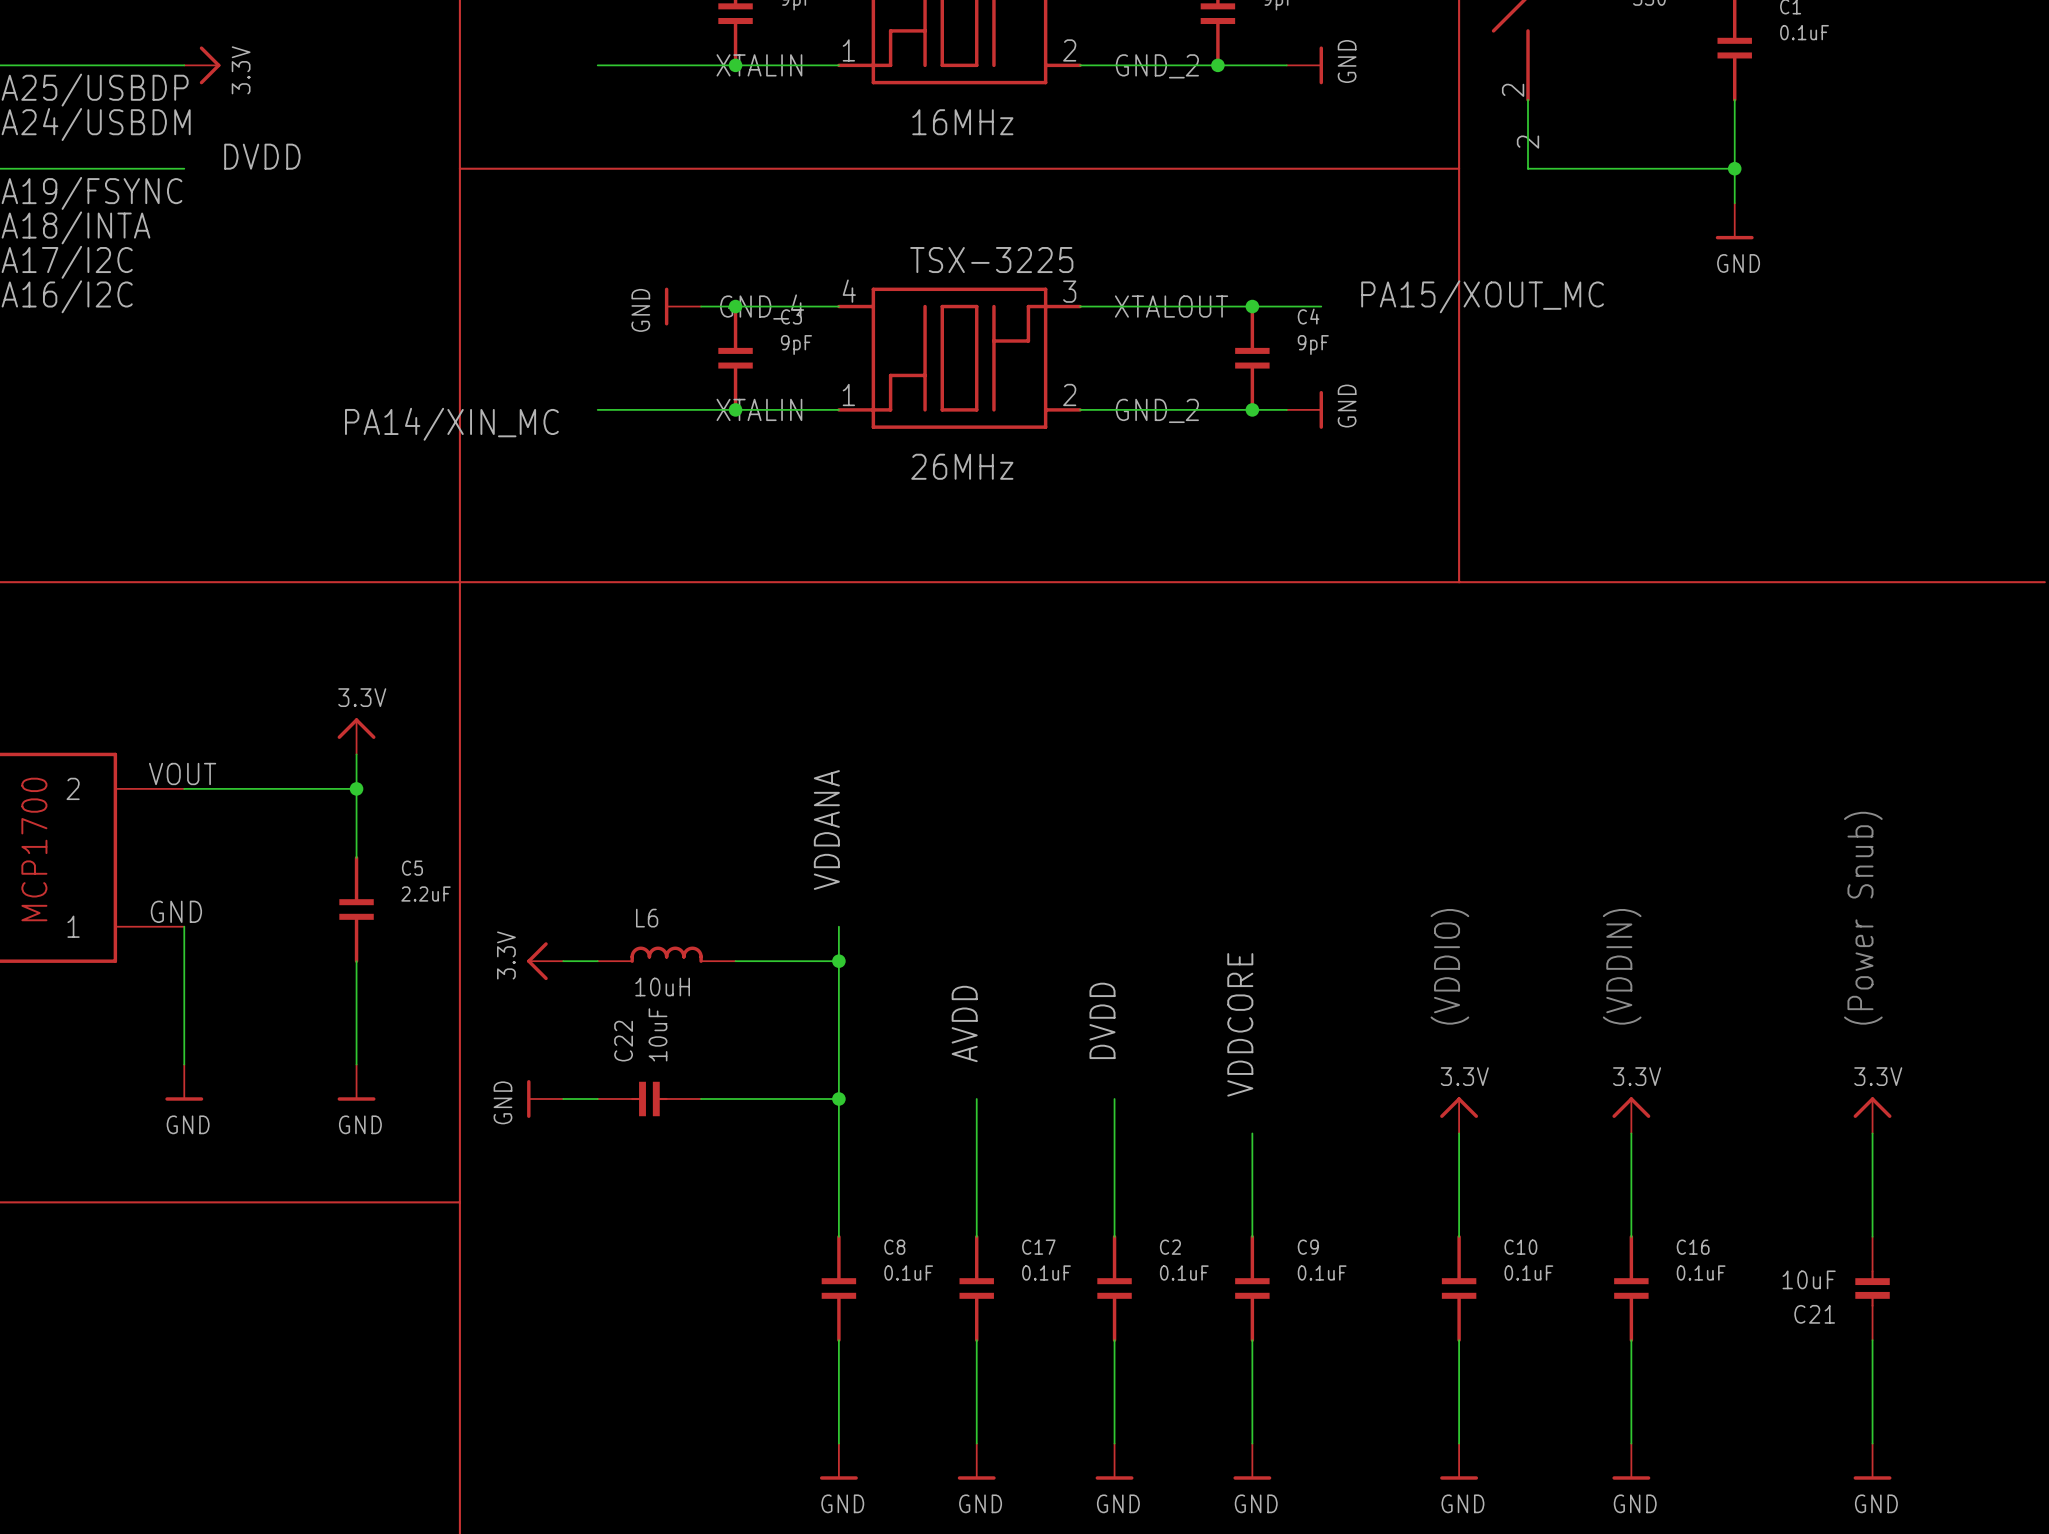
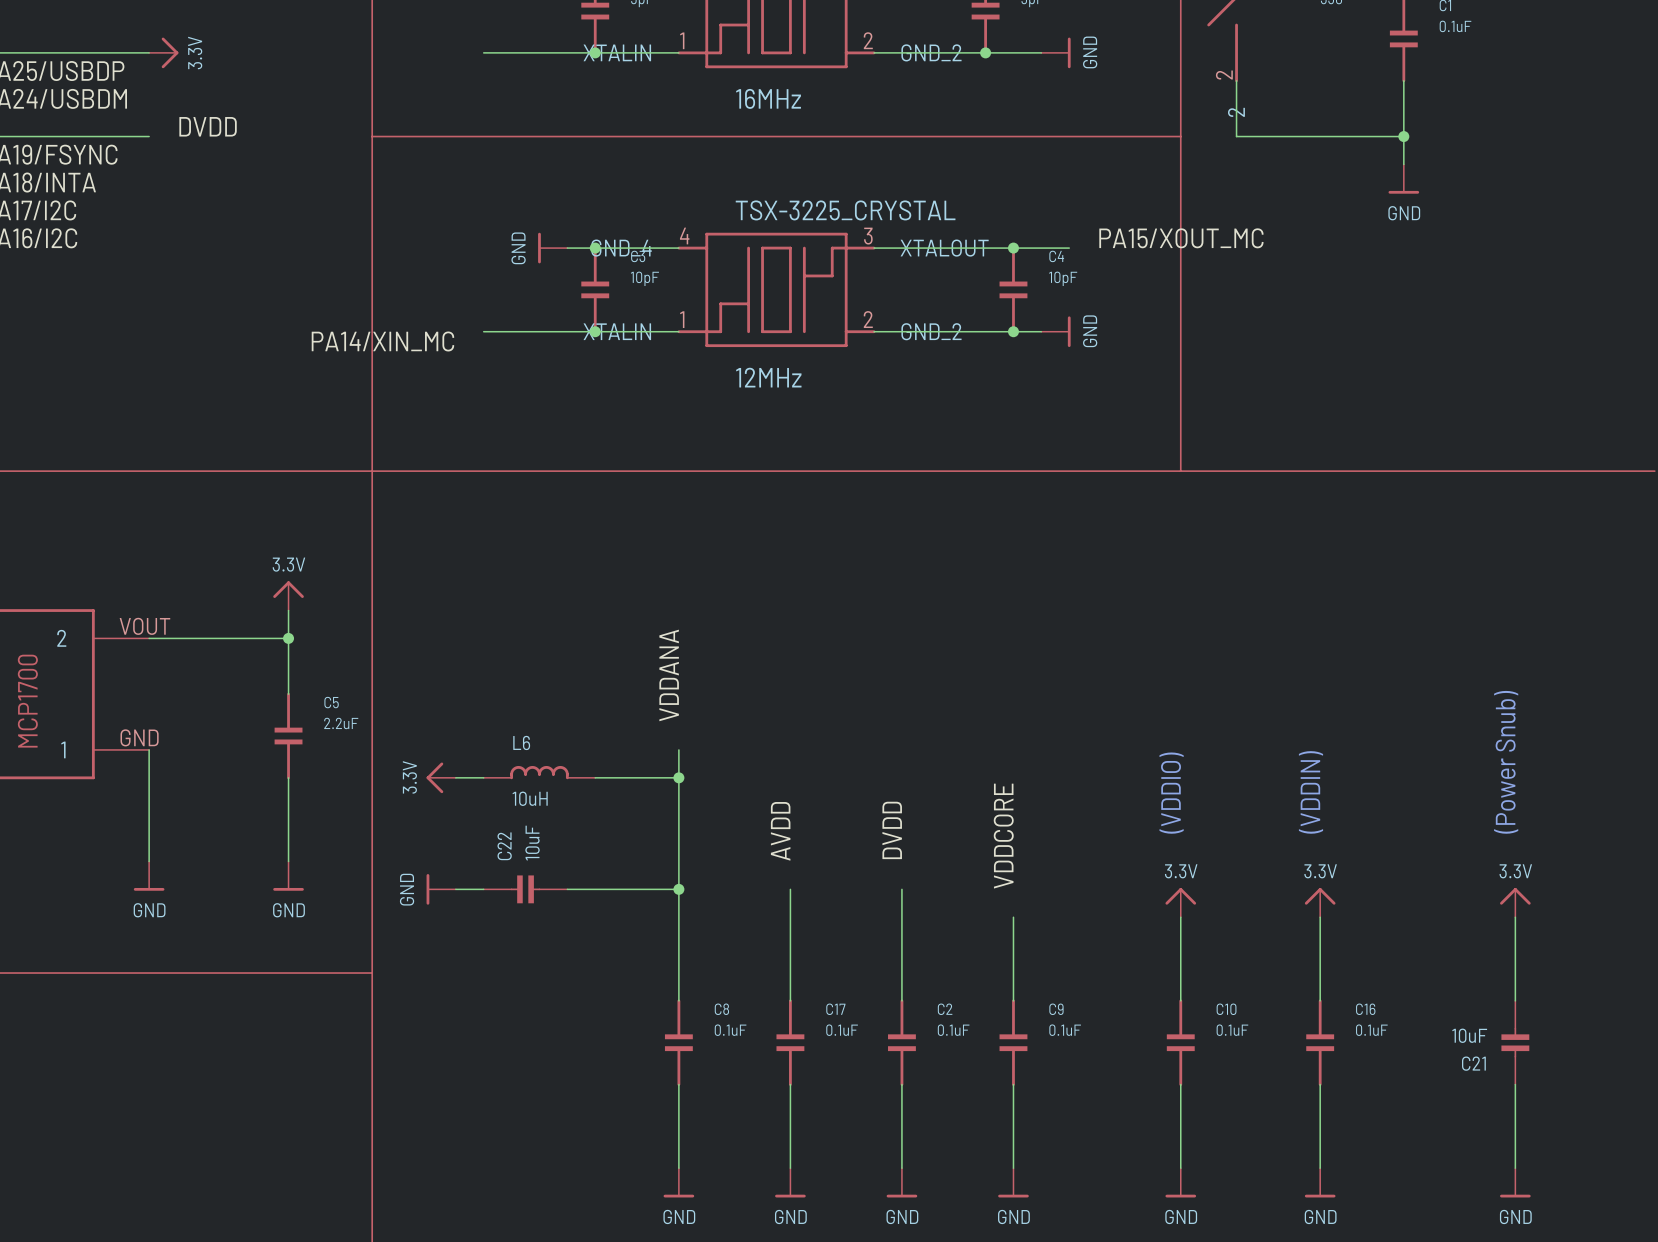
TSX-3225 name: TSX-3225 (991, 260) -> TSX-3225_CRYSTAL (845, 210)
C3 value: 9pF (796, 345) -> 10pF (644, 278)
C4 value: 9pF (1313, 345) -> 10pF (1063, 278)
TSX-3225 value: 26MHz (962, 466) -> 12MHz (768, 377)

